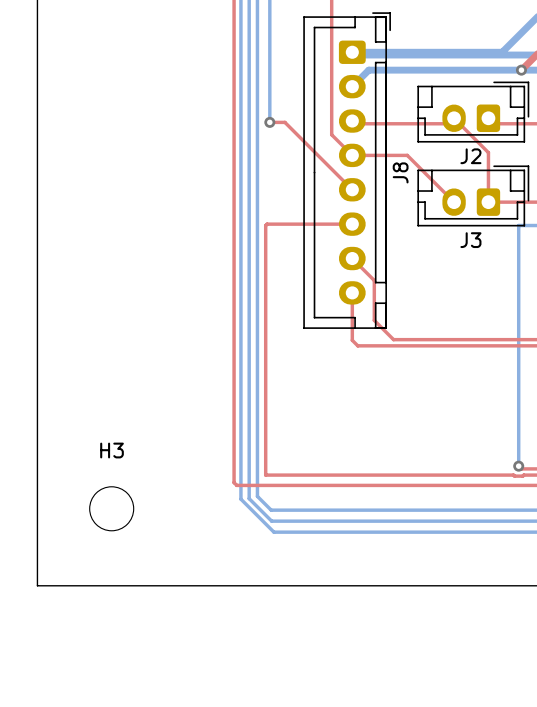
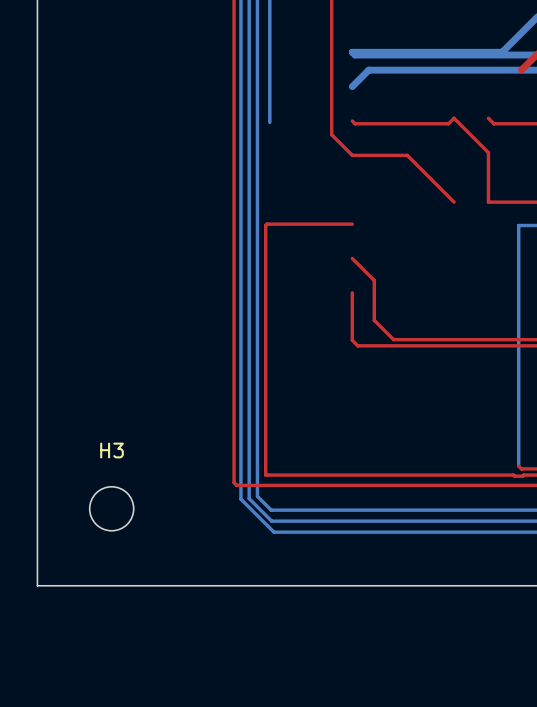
via: (521, 70) -> none
J2: (473, 112) -> none
top track: (269, 122) (284, 122) (352, 189) -> none
via: (269, 122) -> none
J8: (347, 170) -> none
J3: (473, 195) -> none
via: (518, 466) -> none

